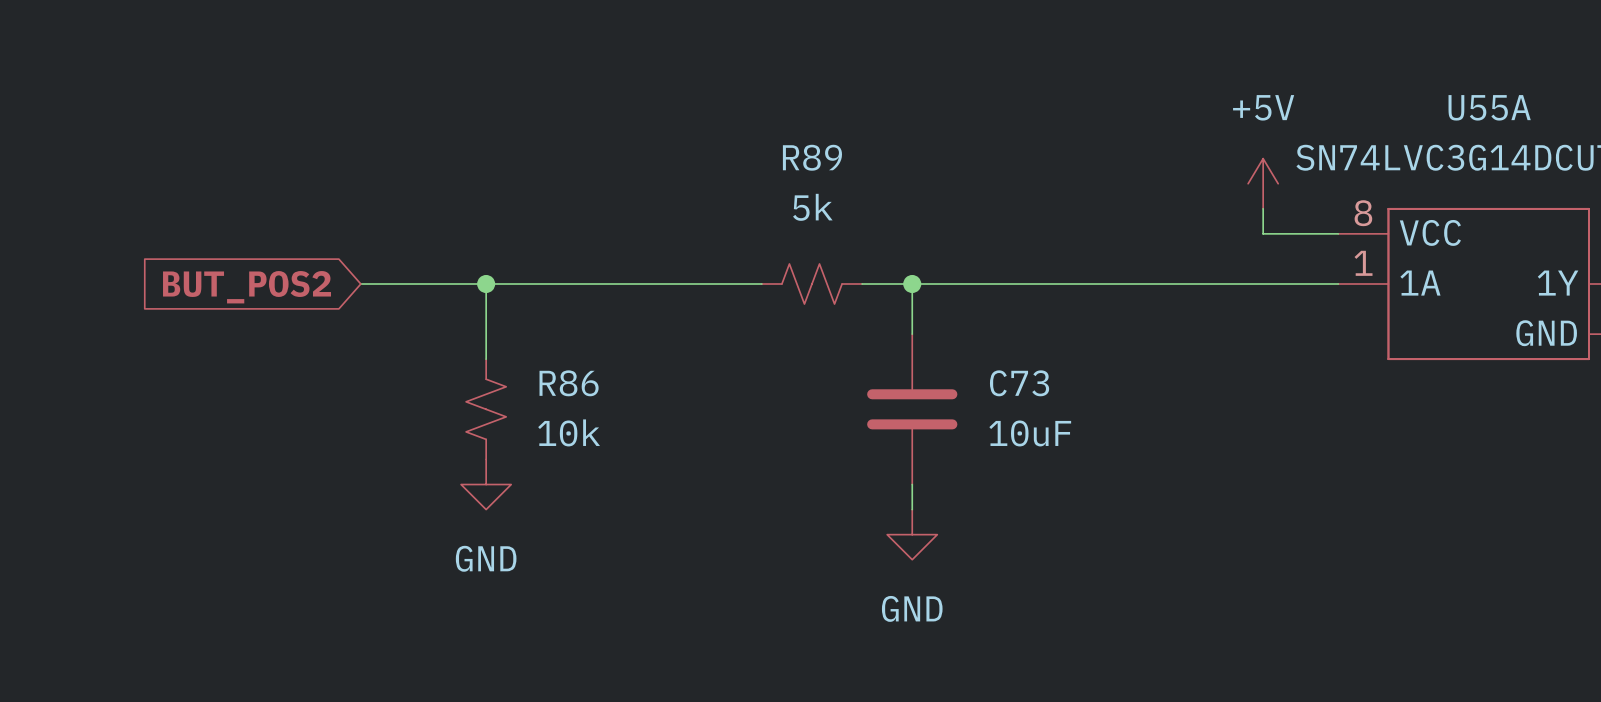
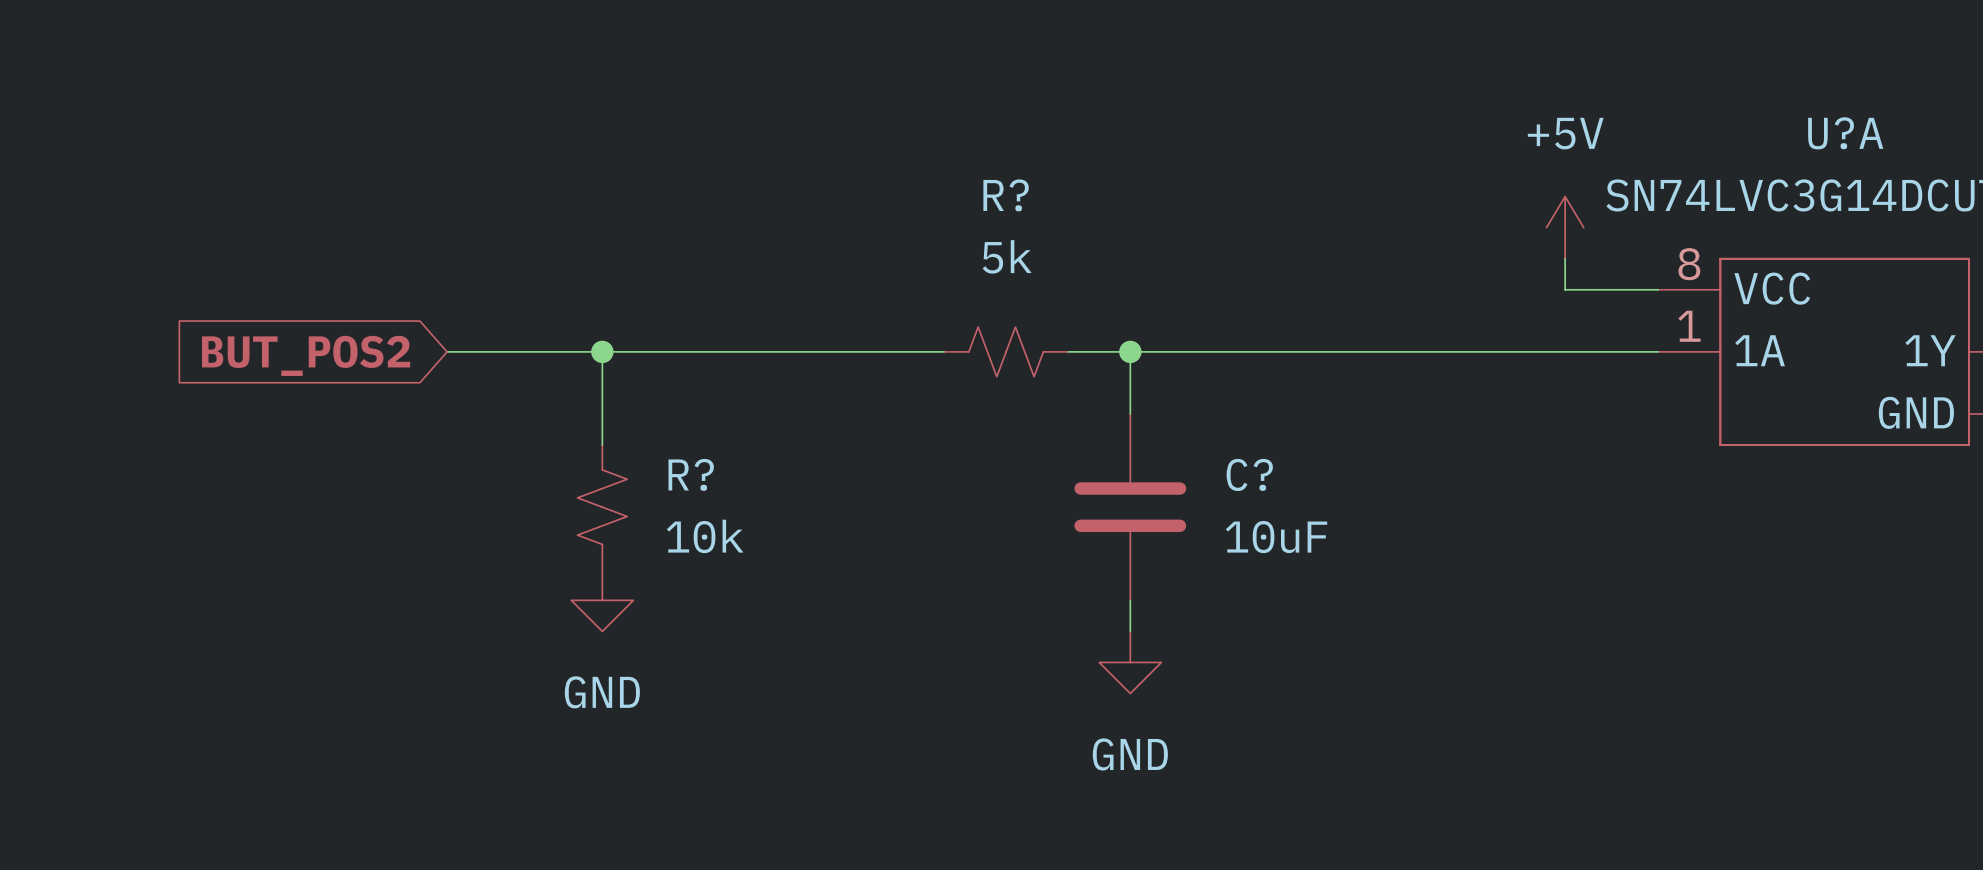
U55A name: U55A (1489, 107) -> U?A (1845, 133)
R89 name: R89 (812, 157) -> R? (1006, 195)
R86 name: R86 (569, 383) -> R? (691, 474)
C73 name: C73 (1019, 383) -> C? (1249, 474)

